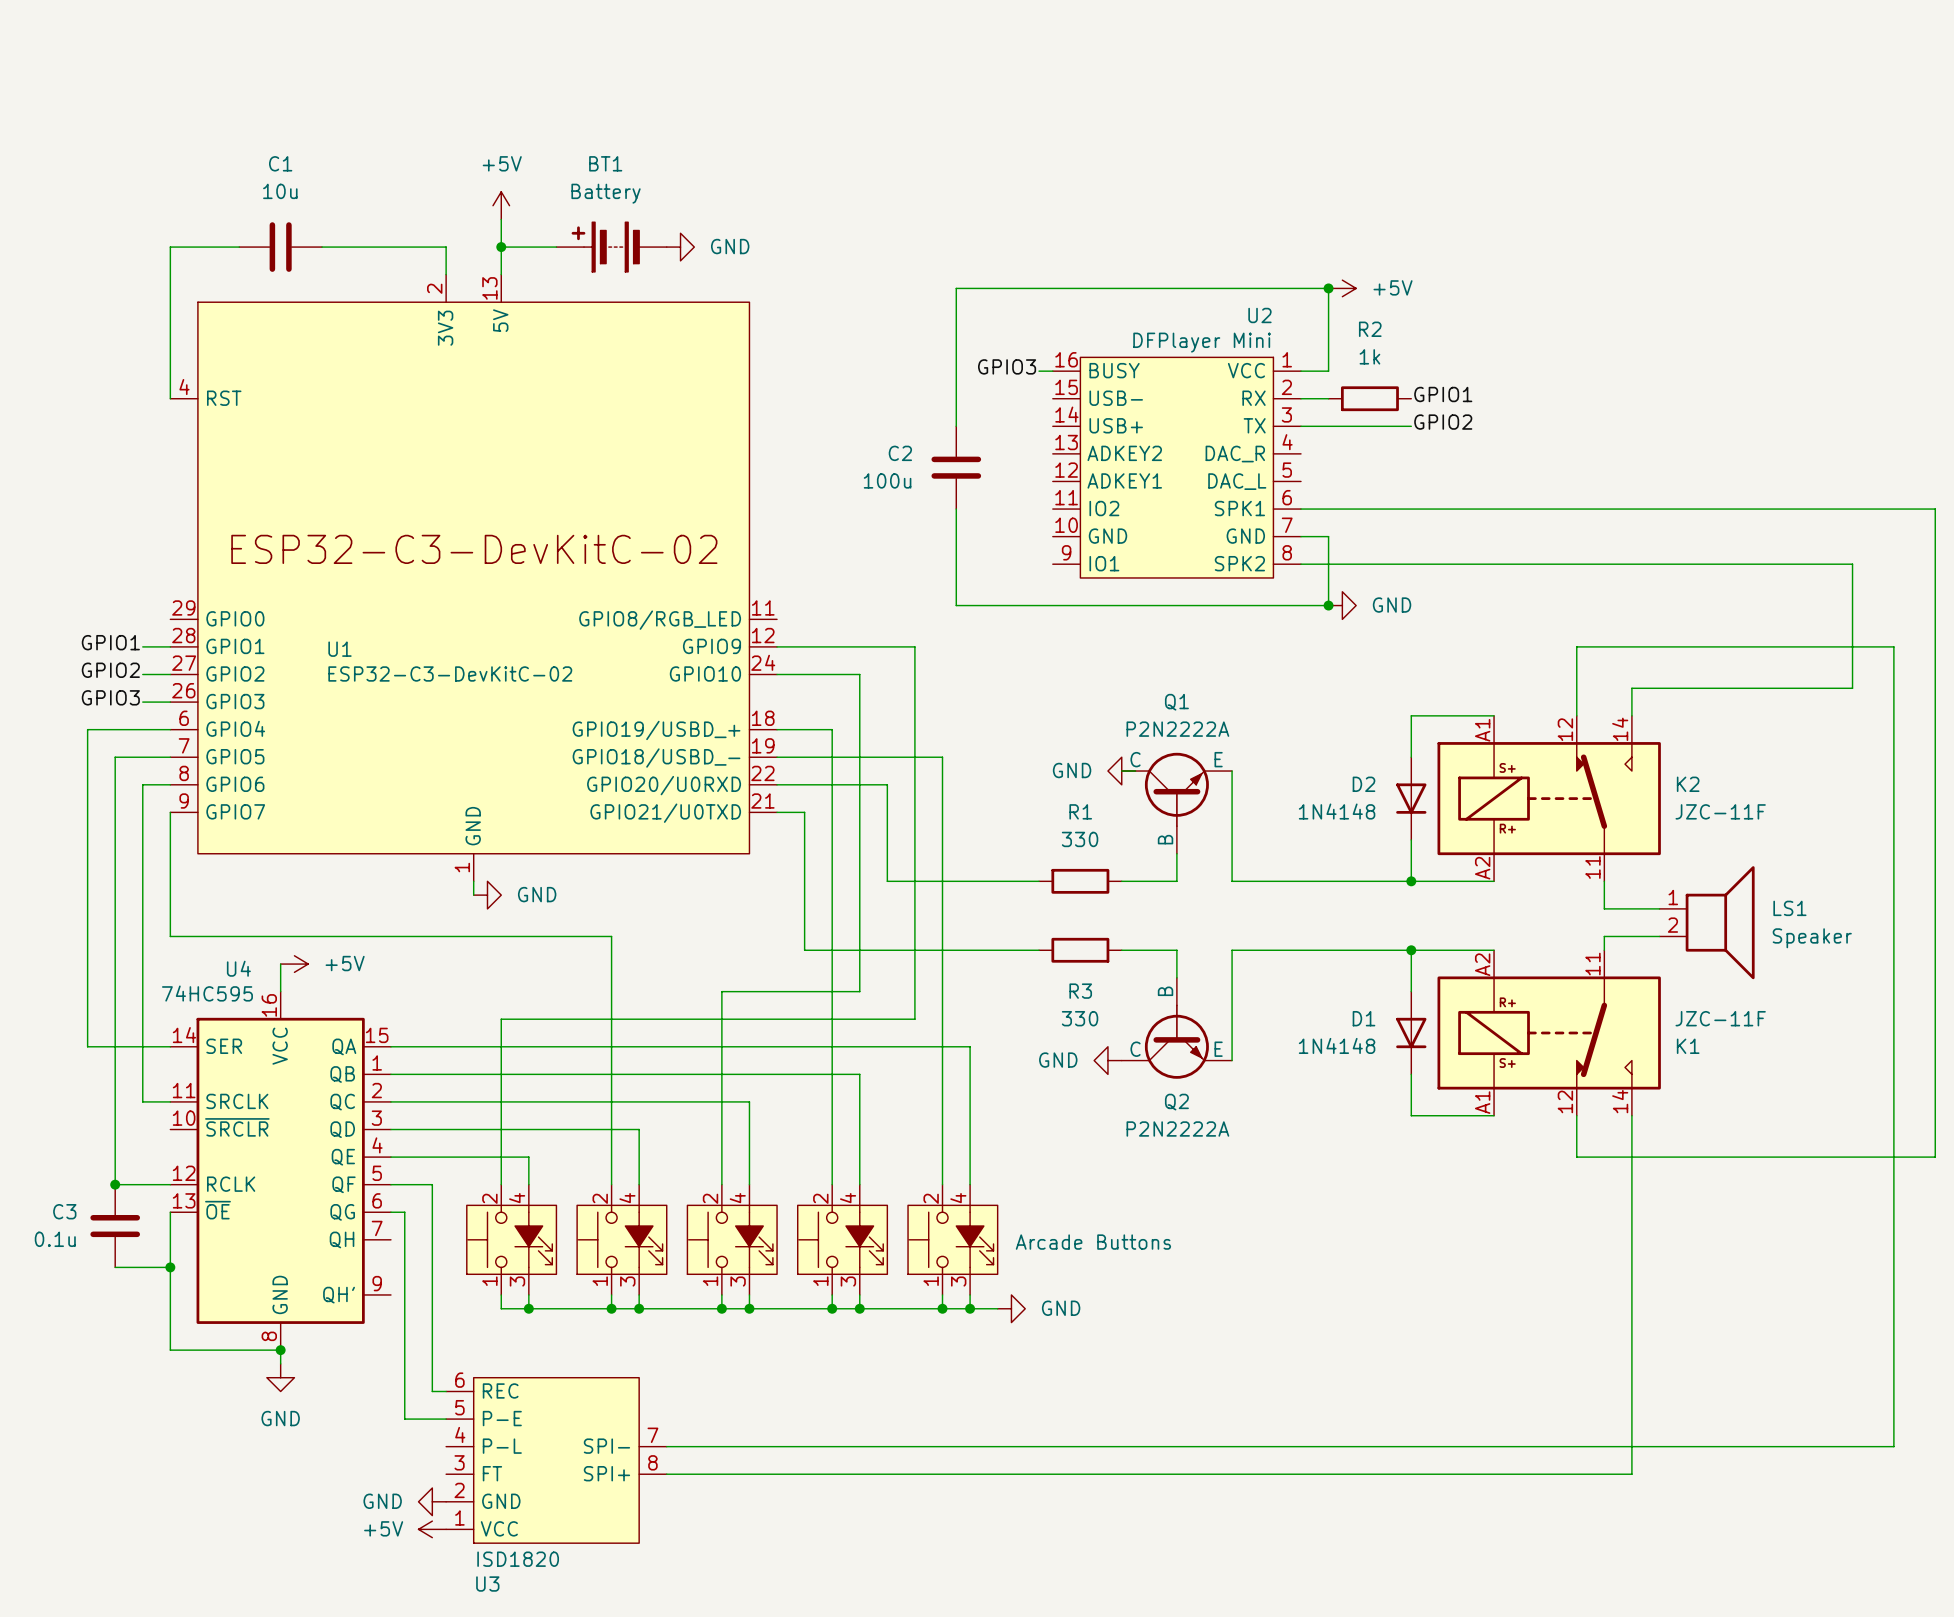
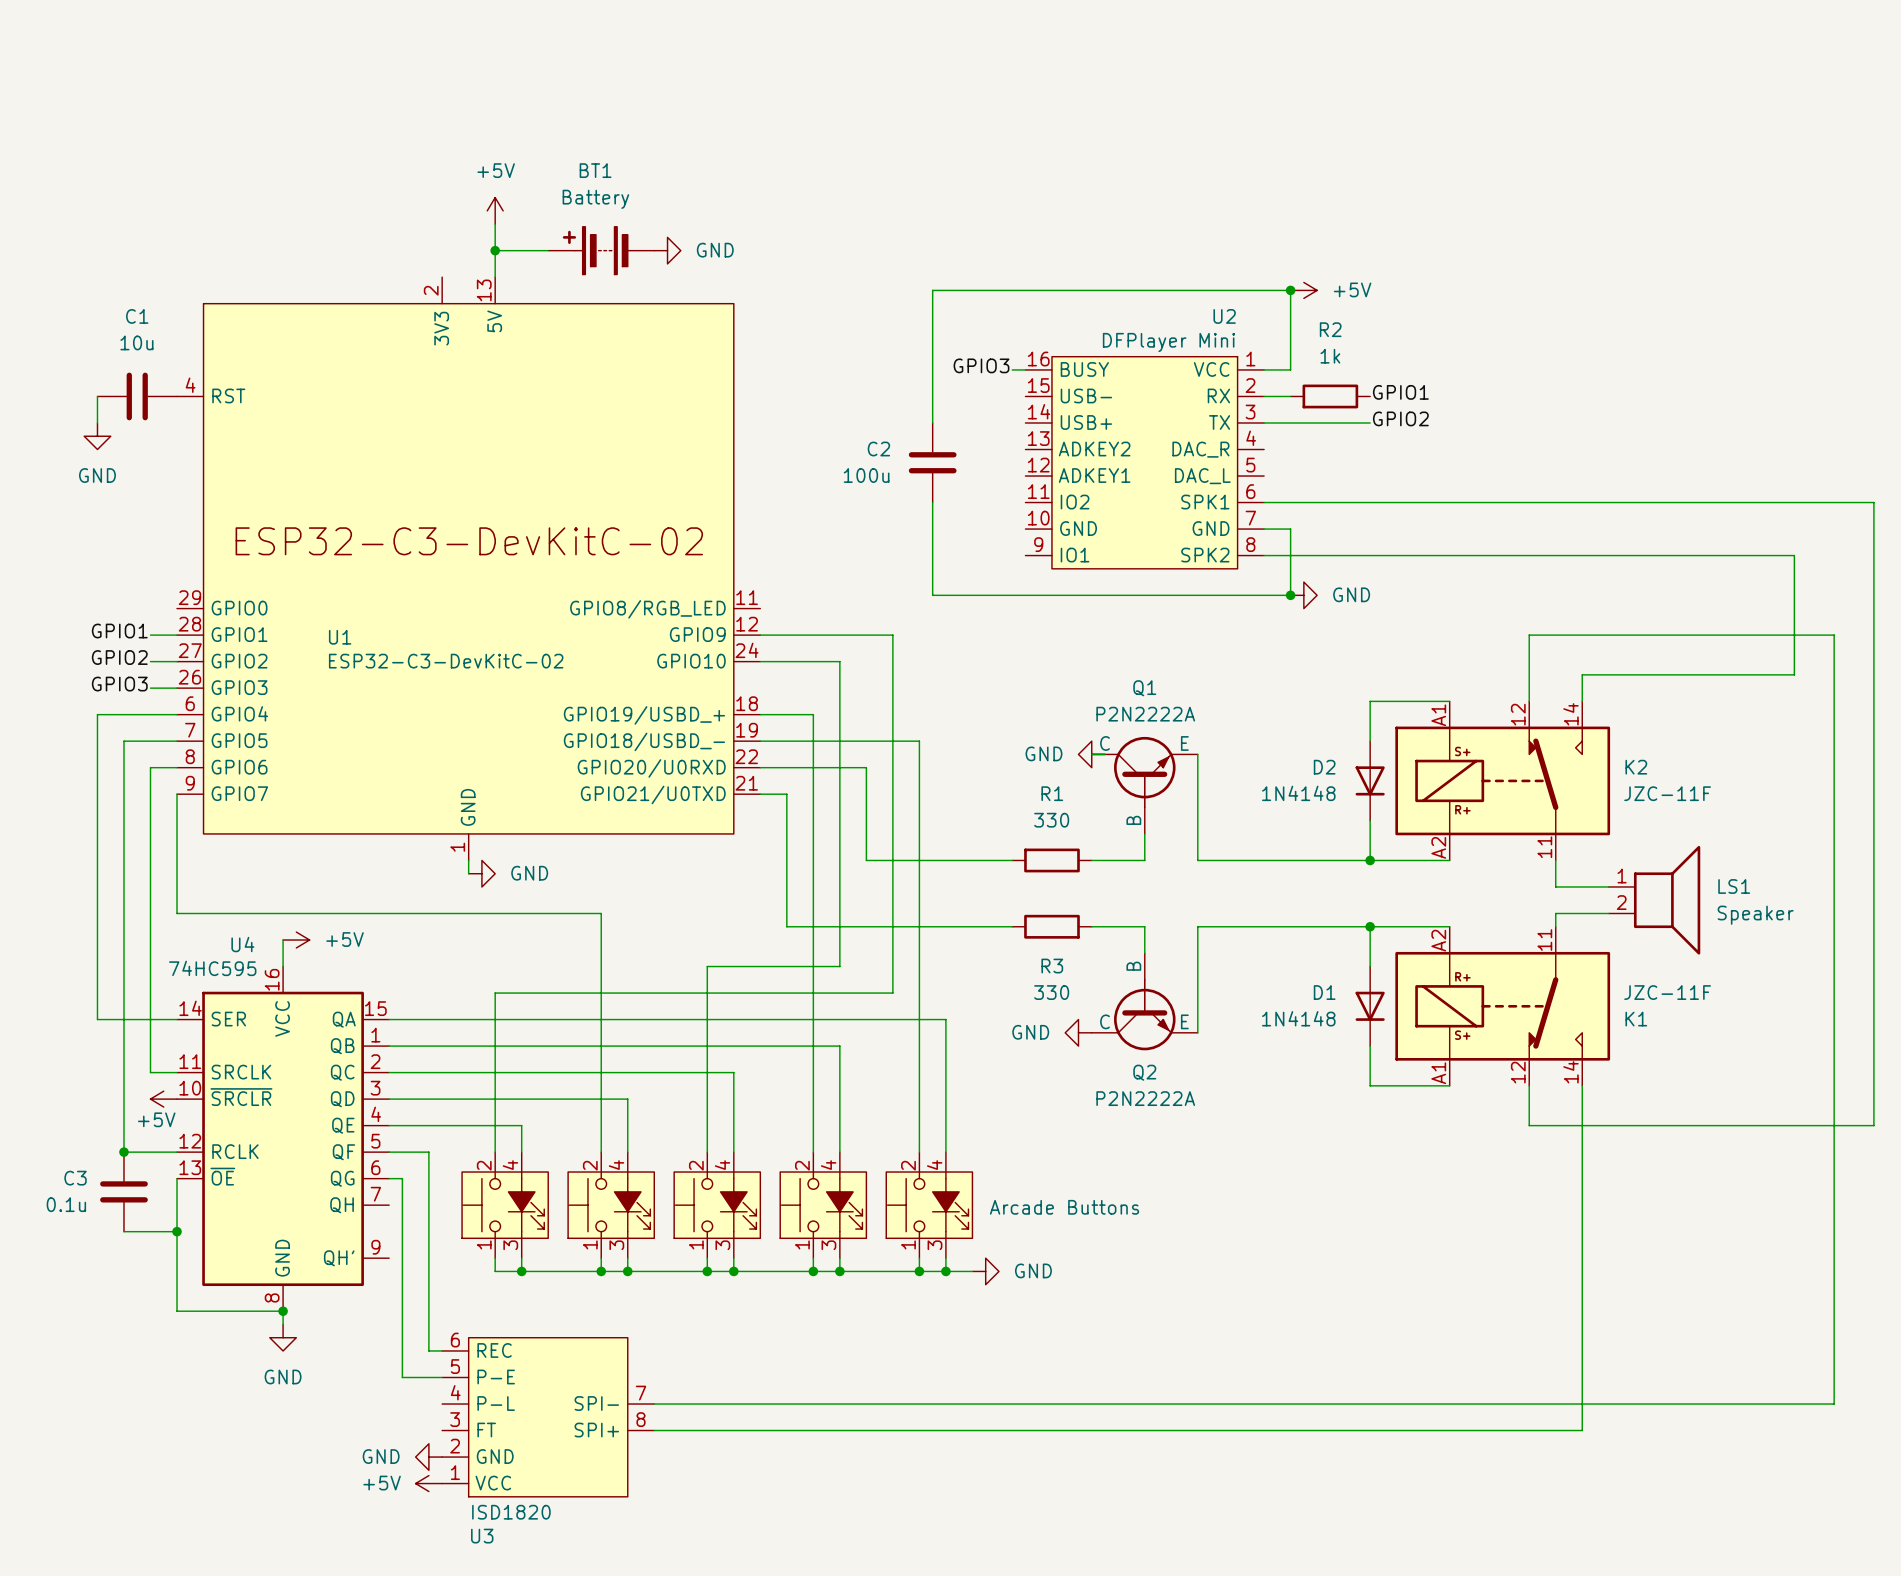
wire: (239, 247) (170, 247) (170, 398) -> none
C1 position: (280, 247) -> (137, 396)
wire: (322, 247) (446, 247) (446, 274) -> none
wire: none -> (97, 396) (97, 422)
power symbol: none -> GND (97, 436)
power symbol: none -> +5V (163, 1099)

